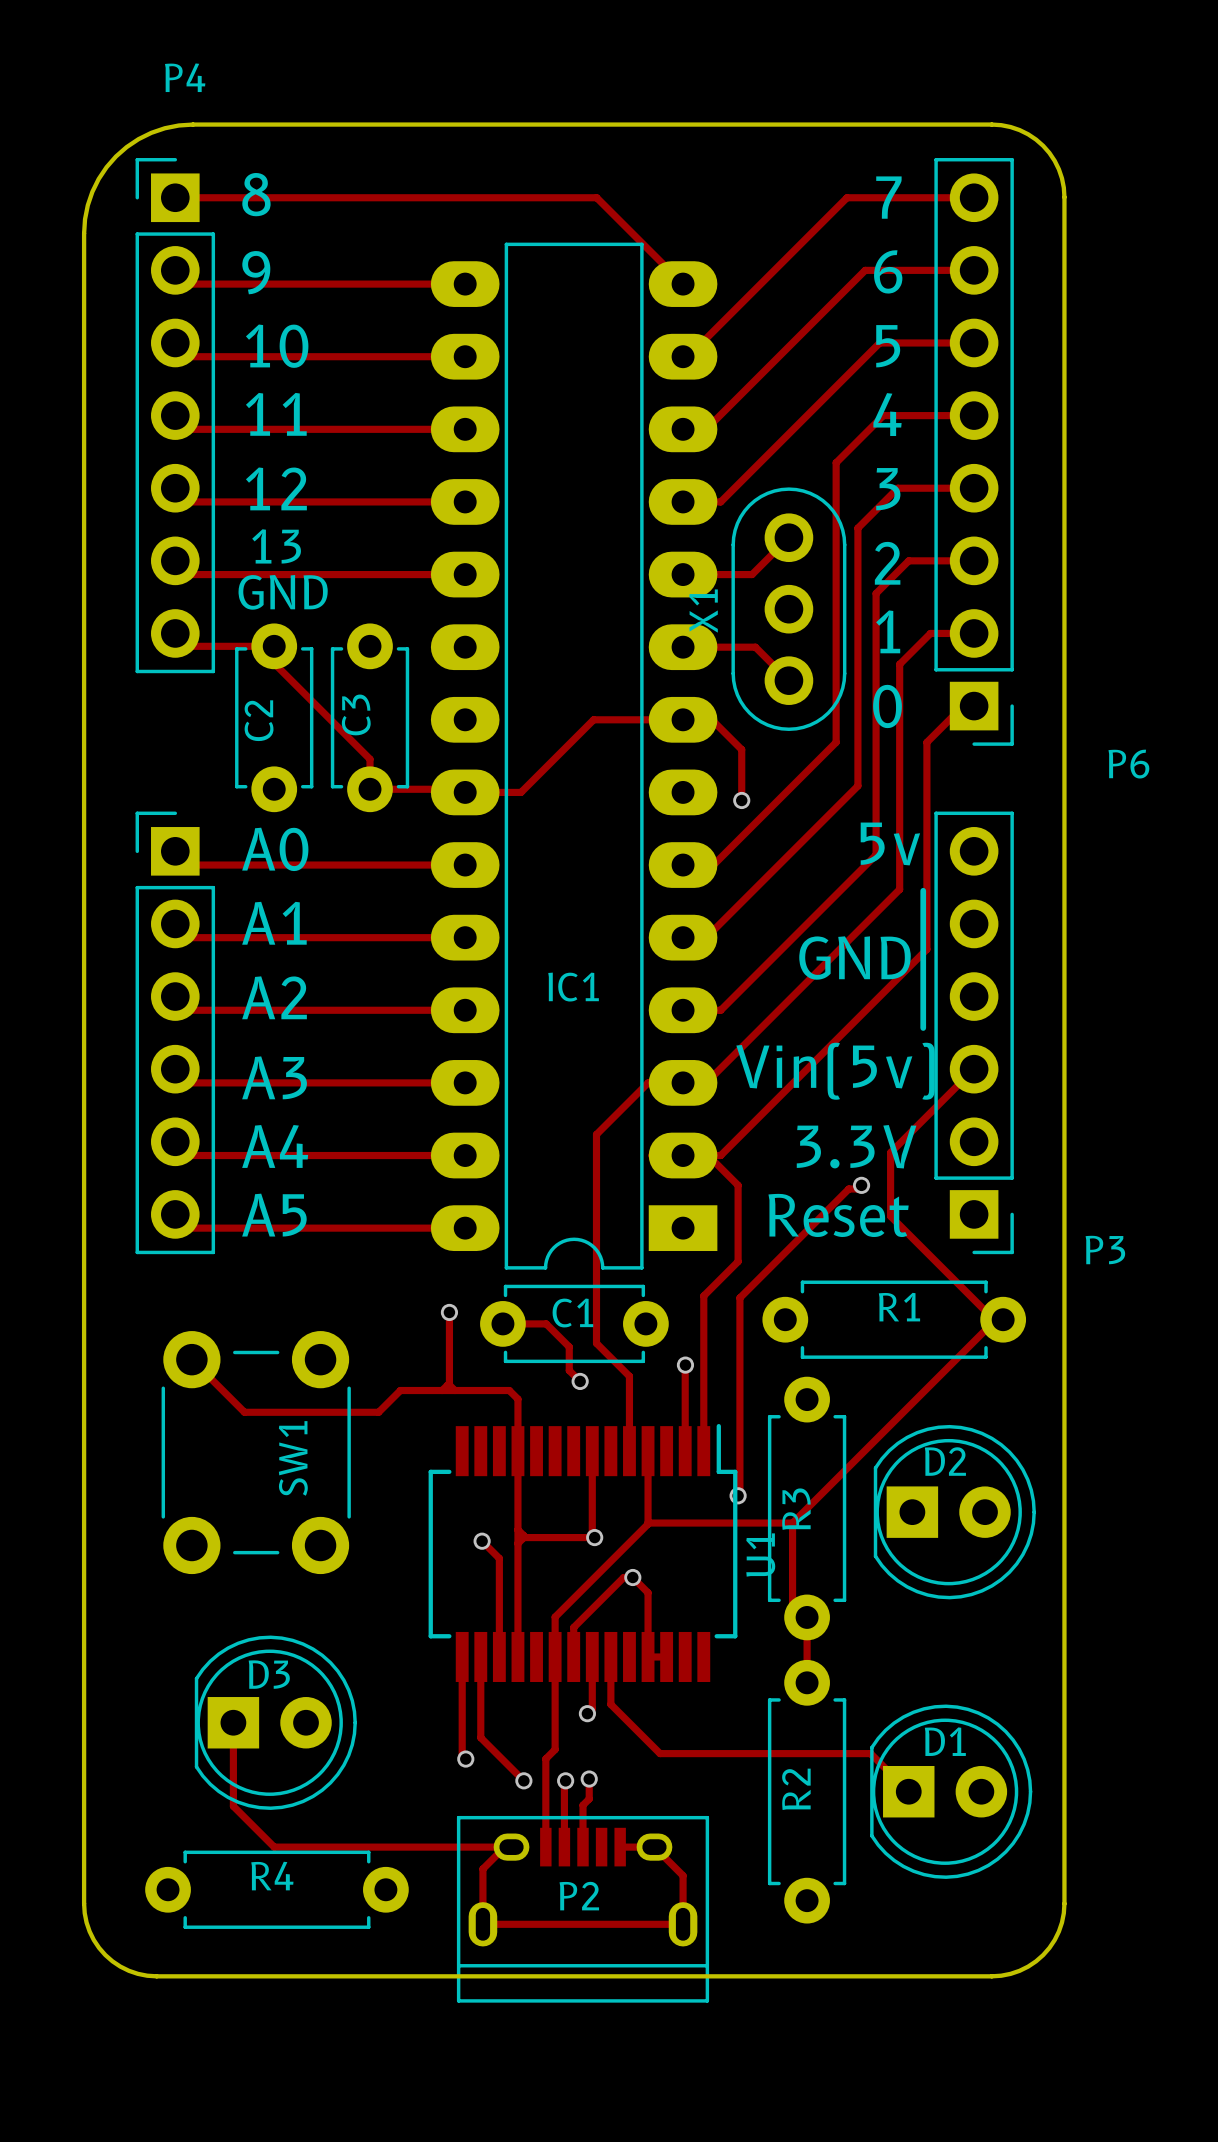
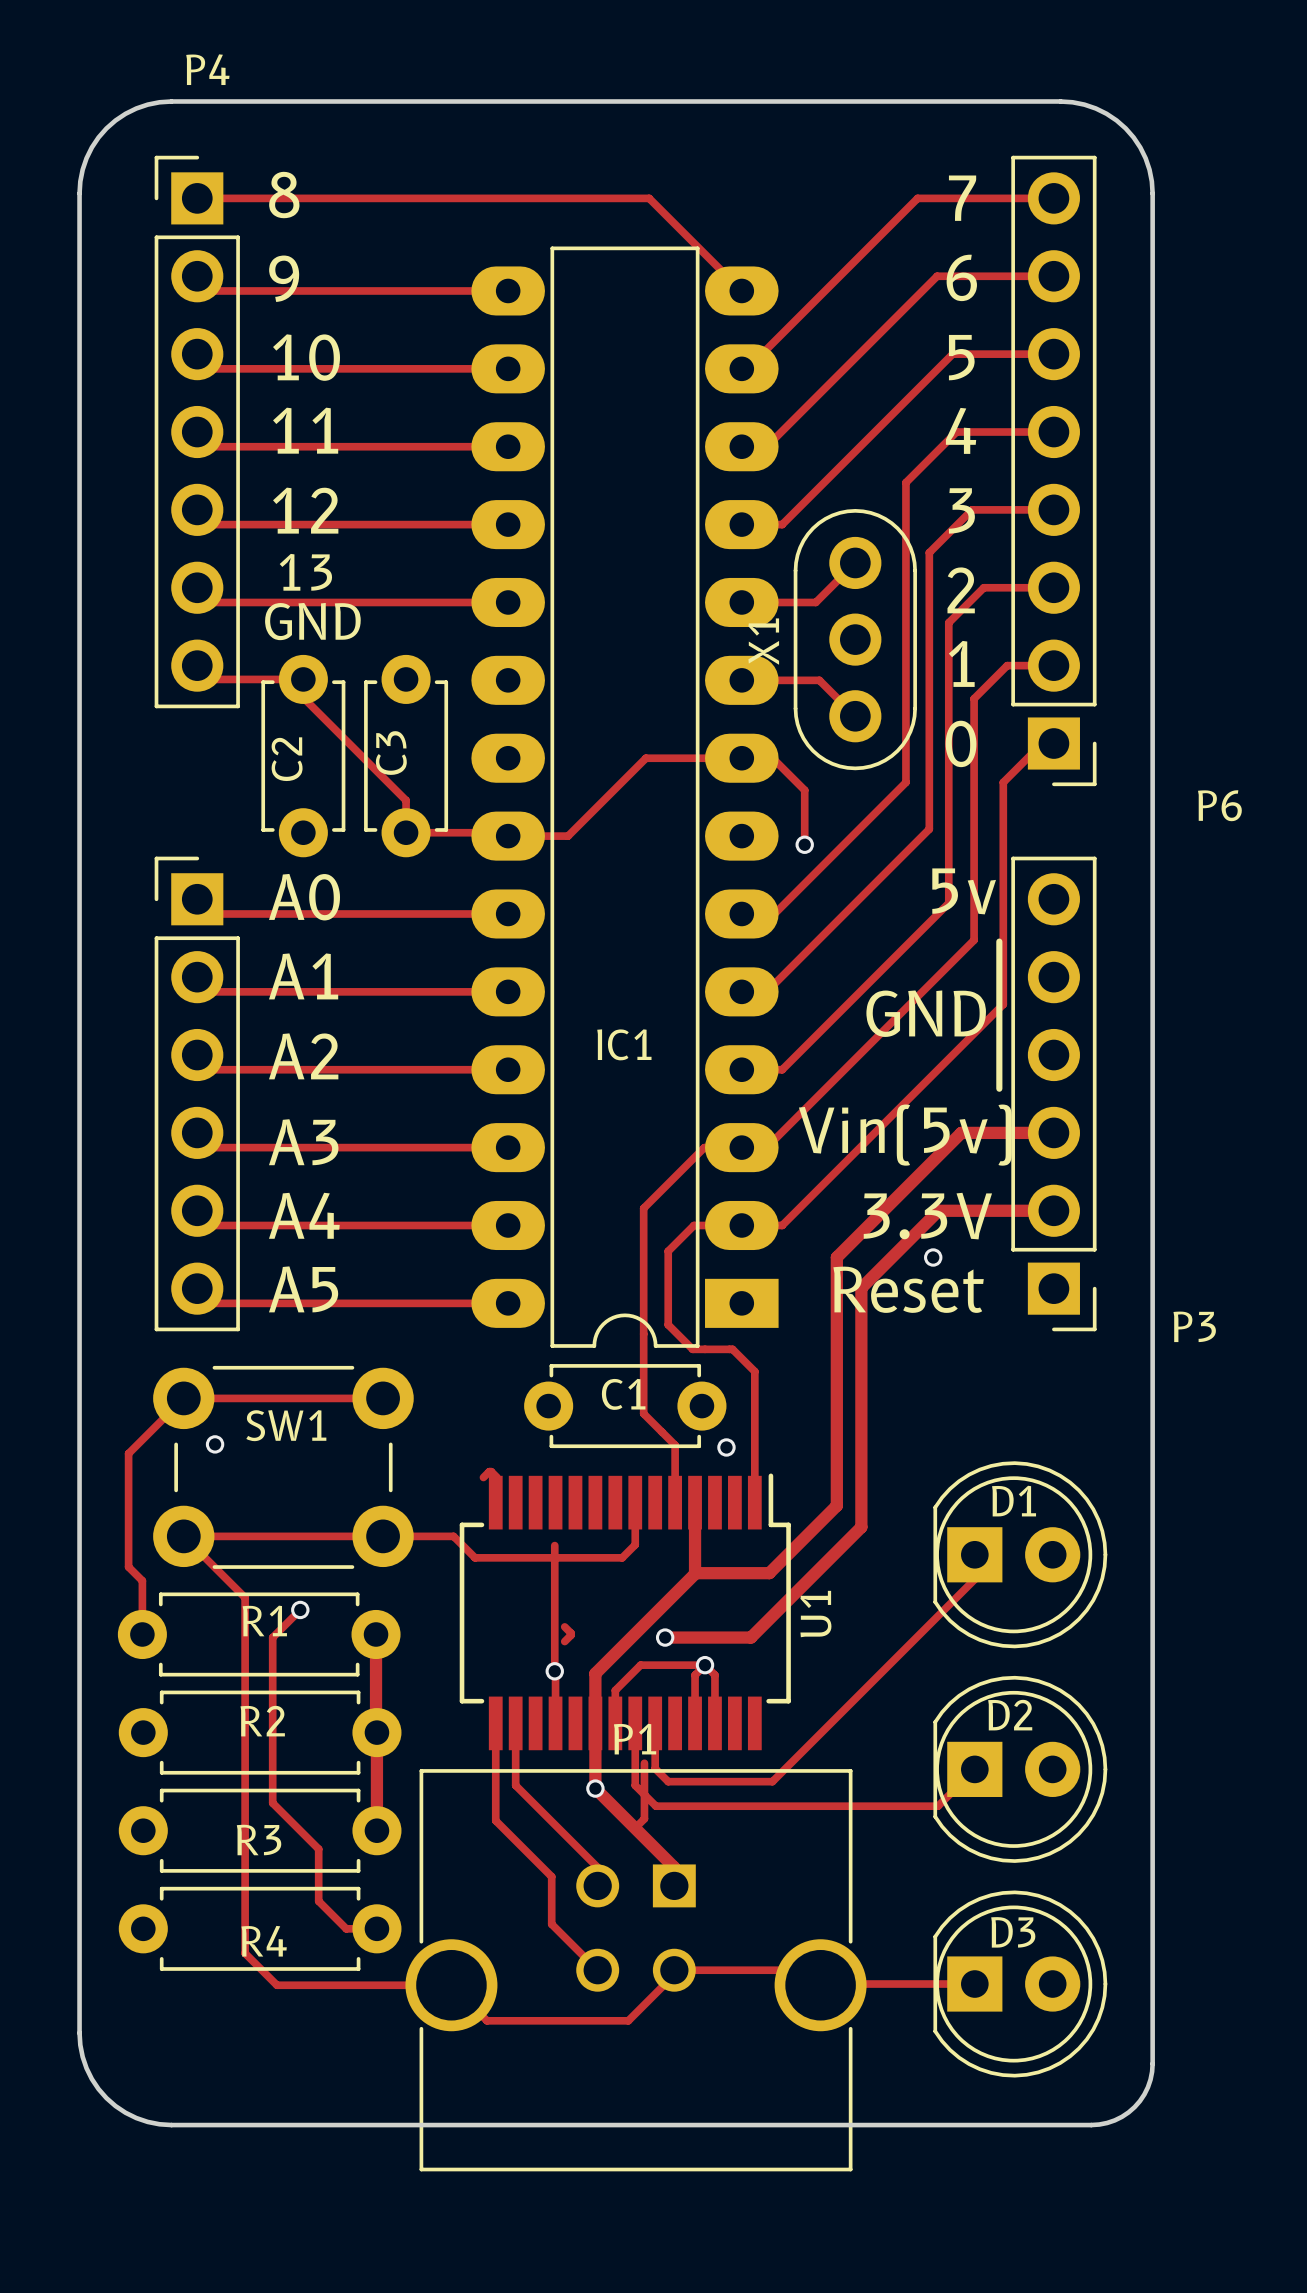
board edge: (193, 124) (991, 124) (1019, 130) (1036, 139) (1049, 152) (1058, 169) (1064, 197) (1064, 1903) (1058, 1931) (1049, 1947) (1036, 1961) (1019, 1970) (991, 1976) (156, 1976) (128, 1970) (112, 1961) (99, 1947) (89, 1931) (84, 1903) (84, 233) (87, 205) (92, 191) (106, 167) (116, 156) (126, 147) (151, 132) (164, 128) (193, 124) -> (171, 101) (147, 104) (136, 108) (125, 113) (106, 128) (91, 147) (86, 158) (82, 169) (79, 193) (79, 2033) (82, 2056) (86, 2068) (91, 2079) (106, 2098) (125, 2112) (147, 2121) (171, 2125) (1091, 2125) (1114, 2120) (1128, 2112) (1144, 2094) (1150, 2079) (1152, 2063) (1152, 193) (1151, 181) (1145, 158) (1140, 147) (1125, 128) (1106, 113) (1084, 104) (1060, 101) (171, 101)
track: (974, 1069) (890, 1152) (890, 1216) (994, 1319) (1003, 1319) -> (1053, 1132) (961, 1132) (836, 1257) (836, 1505) (769, 1573) (695, 1573)
track: (596, 1134) (596, 1343) (629, 1376) (629, 1451) -> (648, 1202) (643, 1208) (643, 1413) (675, 1445) (675, 1502)
track: none -> (1053, 1210) (938, 1210) (861, 1288) (861, 1527) (751, 1637) (665, 1637)
track: none -> (708, 1225) (693, 1225) (668, 1251) (668, 1324) (692, 1349) (732, 1349) (754, 1371) (754, 1502)
track: (708, 1155) (738, 1185) (738, 1261) (703, 1295) (703, 1451) -> none
track: (861, 1185) (857, 1188) (848, 1188) (739, 1297) (739, 1493) (738, 1495) -> none
track: (449, 1312) (449, 1385) (447, 1386) -> none
via: (449, 1312) -> none
track: none -> (383, 1398) (183, 1398) (128, 1453) (128, 1567) (142, 1580) (142, 1634)
R1 position: (894, 1319) -> (259, 1634)
track: (995, 1319) (792, 1523) -> none
track: (502, 1323) (546, 1323) (569, 1346) (569, 1370) (580, 1381) -> none
track: (191, 1359) (244, 1412) (378, 1412) (400, 1390) (509, 1390) (517, 1399) (517, 1656) -> none
track: (685, 1365) (685, 1451) -> none
via position: (685, 1365) -> (726, 1447)
via: (580, 1381) -> none
track: none -> (635, 1502) (635, 1544) (622, 1557) (475, 1557) (453, 1536) (183, 1536) (245, 1597) (245, 1953) (276, 1985) (451, 1985) (487, 2020) (628, 2020) (674, 1974) (674, 1970) (805, 1970) (819, 1984) (974, 1984)
track: none -> (695, 1502) (695, 1573) (595, 1673) (595, 1788) (674, 1867) (674, 1885)
track: (592, 1451) (592, 1535) (594, 1537) (523, 1537) -> none
track: (648, 1451) (648, 1524) (555, 1617) (555, 1749) (545, 1758) (545, 1847) -> none
SW1 rotation: 0° (256, 1452) -> 90° clockwise (283, 1467)
track: none -> (554, 1545) (555, 1723)
track: none -> (974, 1554) (974, 1579) (772, 1781) (668, 1781) (655, 1768) (655, 1723)
via: (738, 1495) -> none
R3 rotation: 0° (807, 1508) -> 90° clockwise (260, 1830)
R3 position: (807, 1508) -> (260, 1830)
D2 position: (954, 1512) -> (1020, 1769)
track: none -> (300, 1609) (272, 1637) (272, 1803) (318, 1849) (318, 1901) (346, 1928) (376, 1928)
via: none -> (300, 1609)
track: (648, 1523) (792, 1523) -> none
track: (792, 1523) (792, 1602) (807, 1617) (807, 1682) -> none
track: none -> (376, 1634) (376, 1830)
via position: (594, 1537) -> (665, 1637)
track: (482, 1541) (499, 1558) (499, 1656) -> none
via position: (482, 1541) -> (554, 1671)
U1 position: (583, 1552) -> (625, 1611)
track: none -> (705, 1665) (714, 1675) (714, 1723)
track: none -> (705, 1665) (640, 1665) (615, 1690) (615, 1723)
track: none -> (705, 1665) (695, 1675) (695, 1723)
via position: (632, 1577) -> (705, 1665)
track: none -> (515, 1723) (515, 1785) (597, 1867) (597, 1885)
track: none -> (635, 1723) (635, 1785) (655, 1806) (938, 1806) (974, 1769)
track: (462, 1656) (462, 1755) (465, 1759) -> none
track: (480, 1656) (480, 1737) -> (495, 1723) (495, 1820) (524, 1849)
track: (573, 1656) (573, 1627) (623, 1577) (632, 1577) (648, 1592) (648, 1656) (666, 1656) -> none
track: (610, 1656) (610, 1704) (660, 1753) (870, 1753) (908, 1791) -> none
via: none -> (595, 1788)
D1 footprint: [870, 1704, 1033, 1879] -> [933, 1461, 1108, 1649]
via: (587, 1713) -> none
track: (233, 1722) (233, 1806) (274, 1847) (511, 1847) -> none
D3 position: (275, 1722) -> (1020, 1984)
via: (465, 1759) -> none
track: (505, 1762) (523, 1780) -> (551, 1876) (551, 1924) (597, 1970)
track: (589, 1779) (589, 1798) (583, 1805) (583, 1847) -> none
via: (589, 1779) -> none
via: (523, 1780) -> none
track: (565, 1780) (564, 1847) -> none
via: (565, 1780) -> none
R2 rotation: 0° (807, 1791) -> 90° clockwise (260, 1732)
R2 position: (807, 1791) -> (260, 1732)
track: (504, 1847) (482, 1868) (482, 1924) (683, 1924) (683, 1875) (654, 1847) (620, 1847) -> none
P1: none -> (636, 1970)
R4 name position: R4 (272, 1876) -> R4 (264, 1941)
R4 position: (276, 1889) -> (260, 1928)
P2: (583, 1909) -> none

